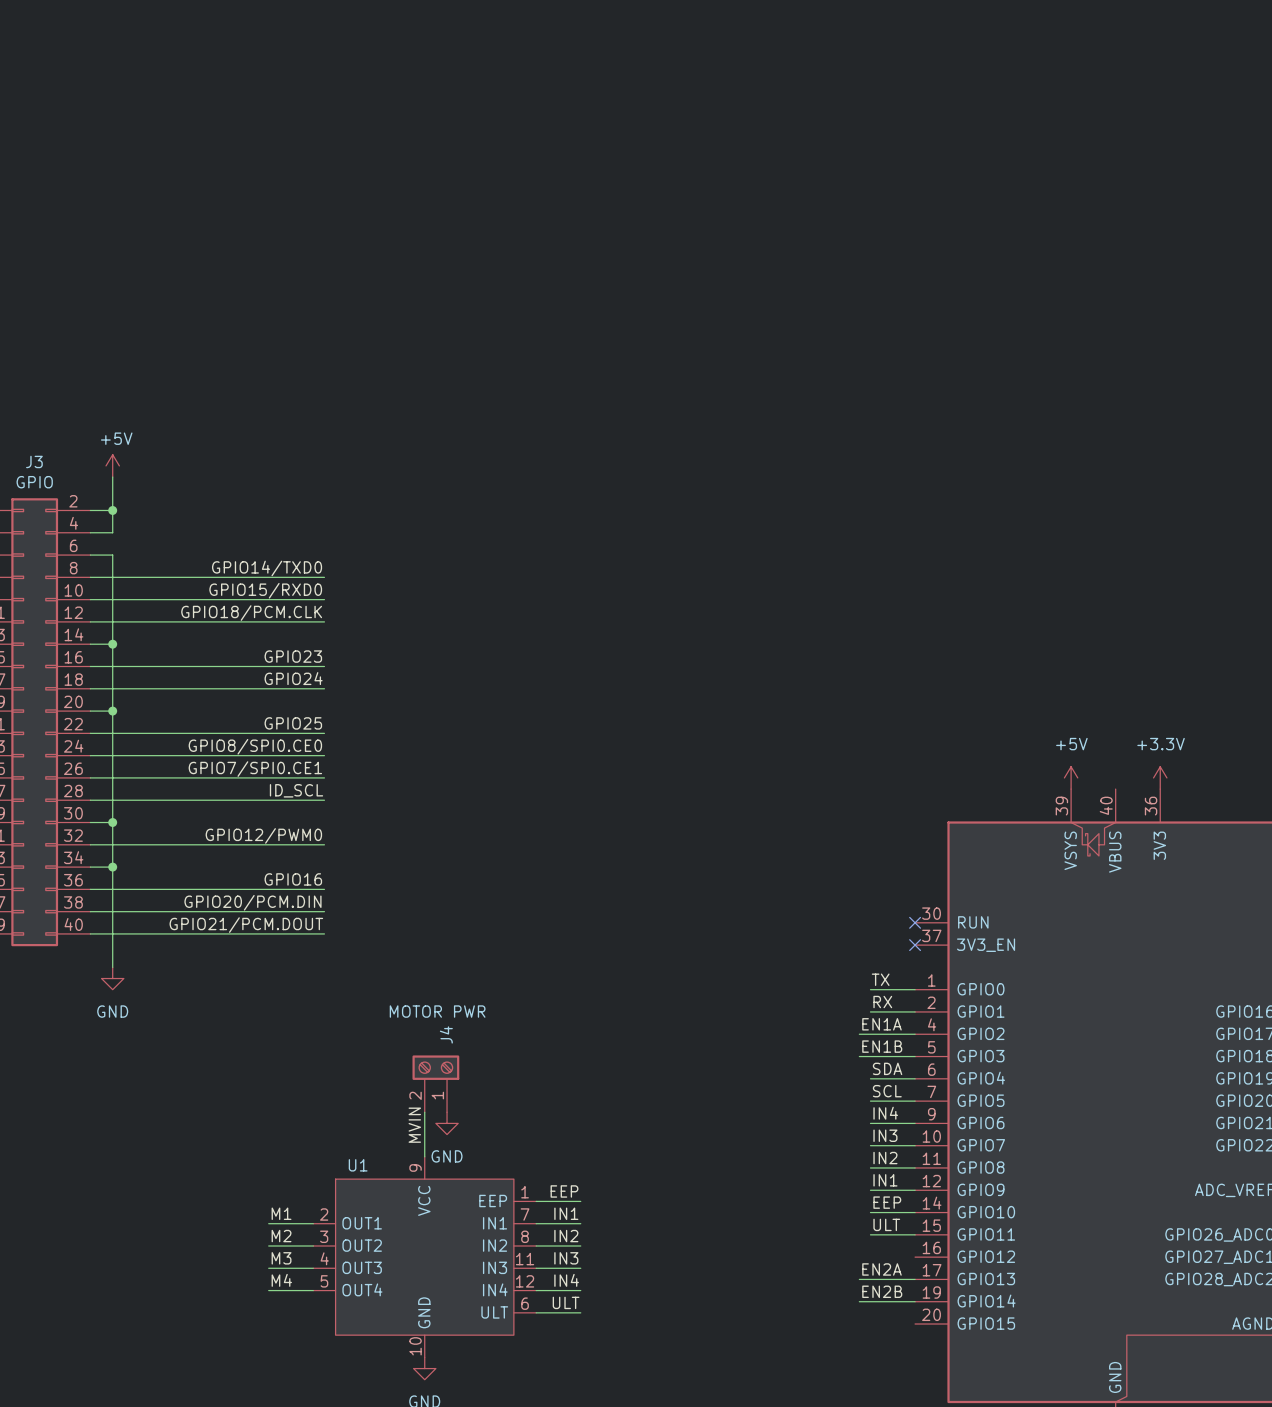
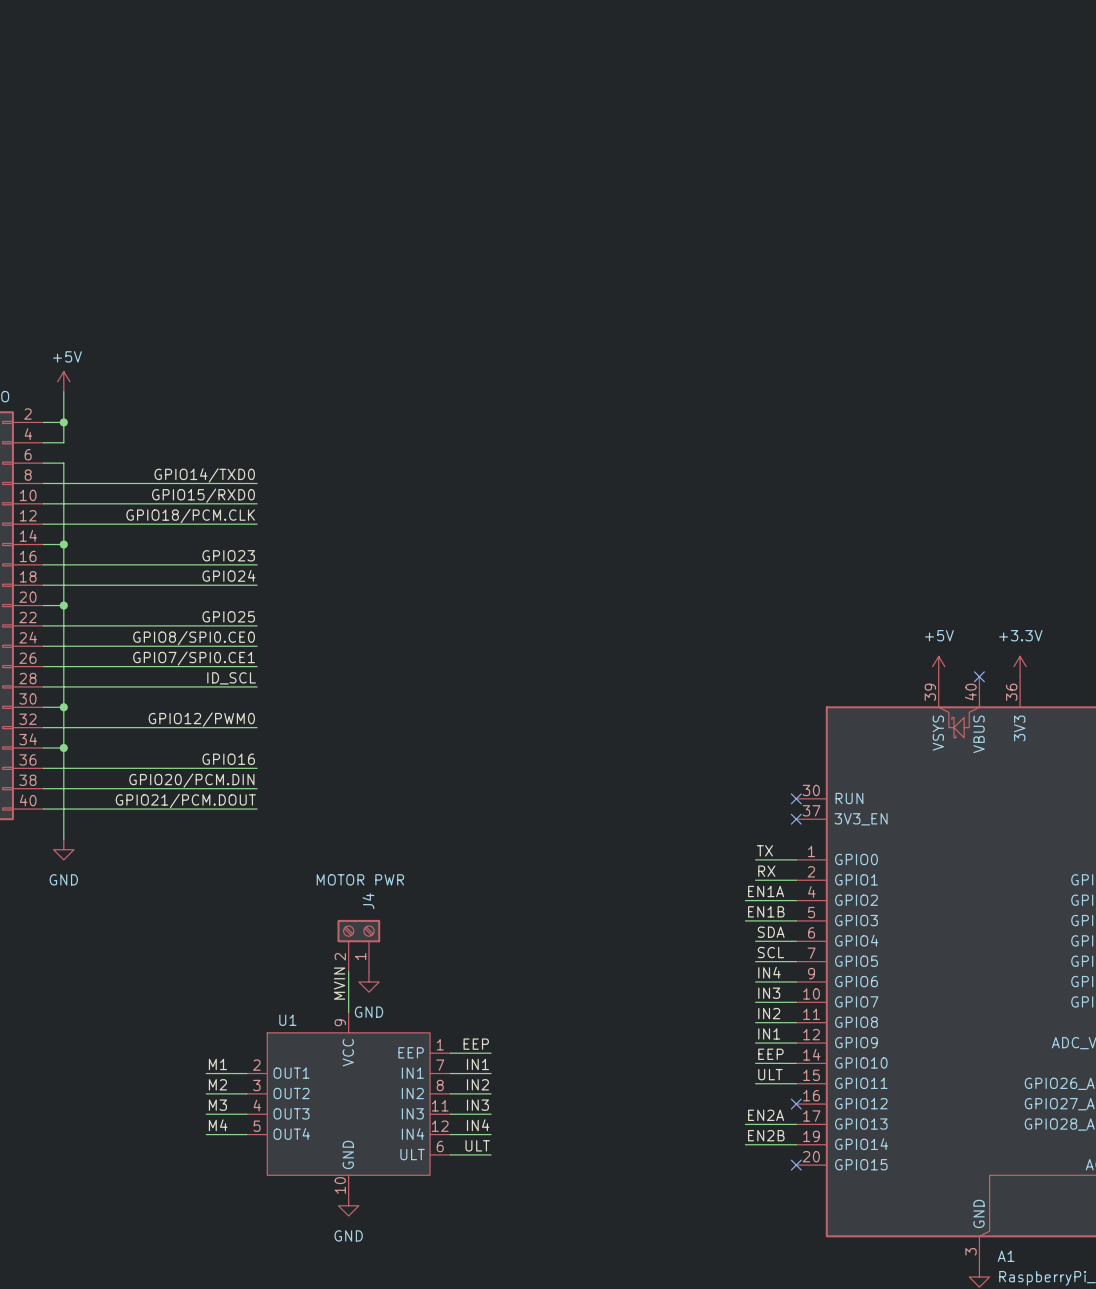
no-connect mark: none -> (979, 676)
no-connect mark: none -> (796, 1104)
no-connect mark: none -> (796, 1165)

